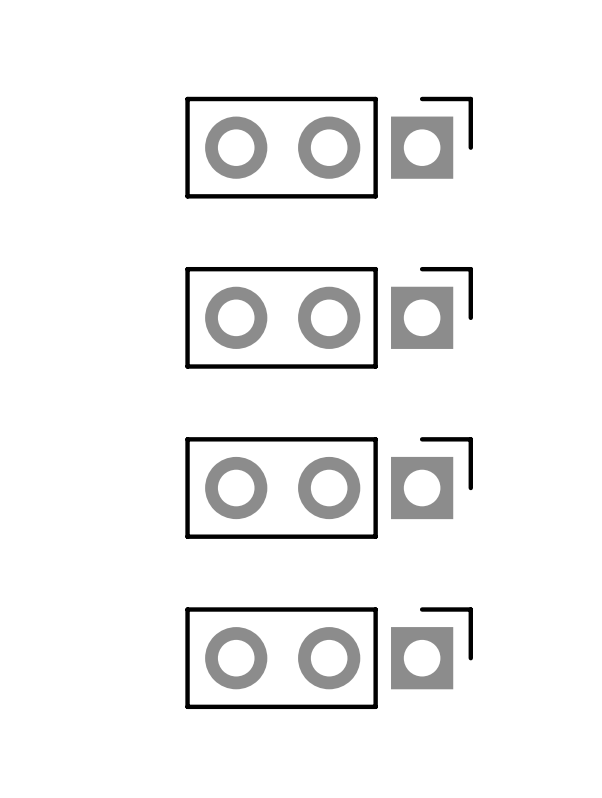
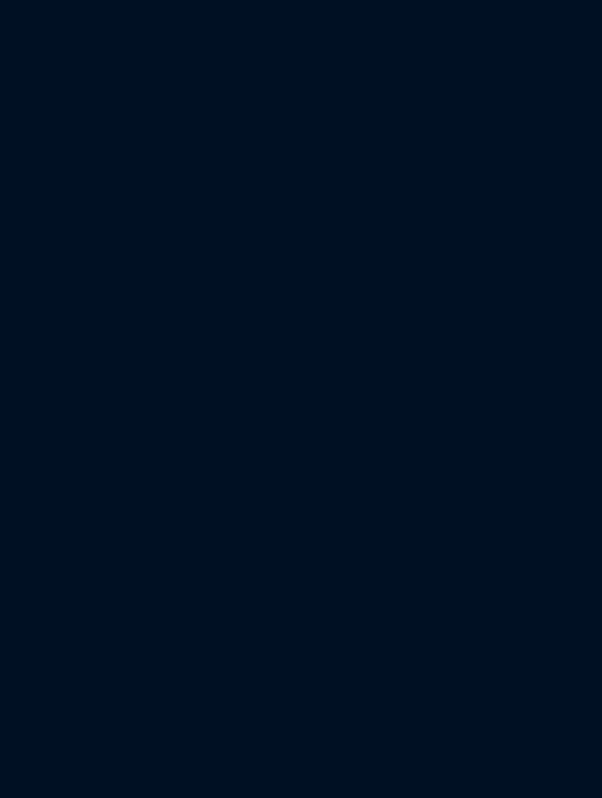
part: (329, 147) -> none
part: (329, 317) -> none
part: (329, 488) -> none
part: (329, 658) -> none

